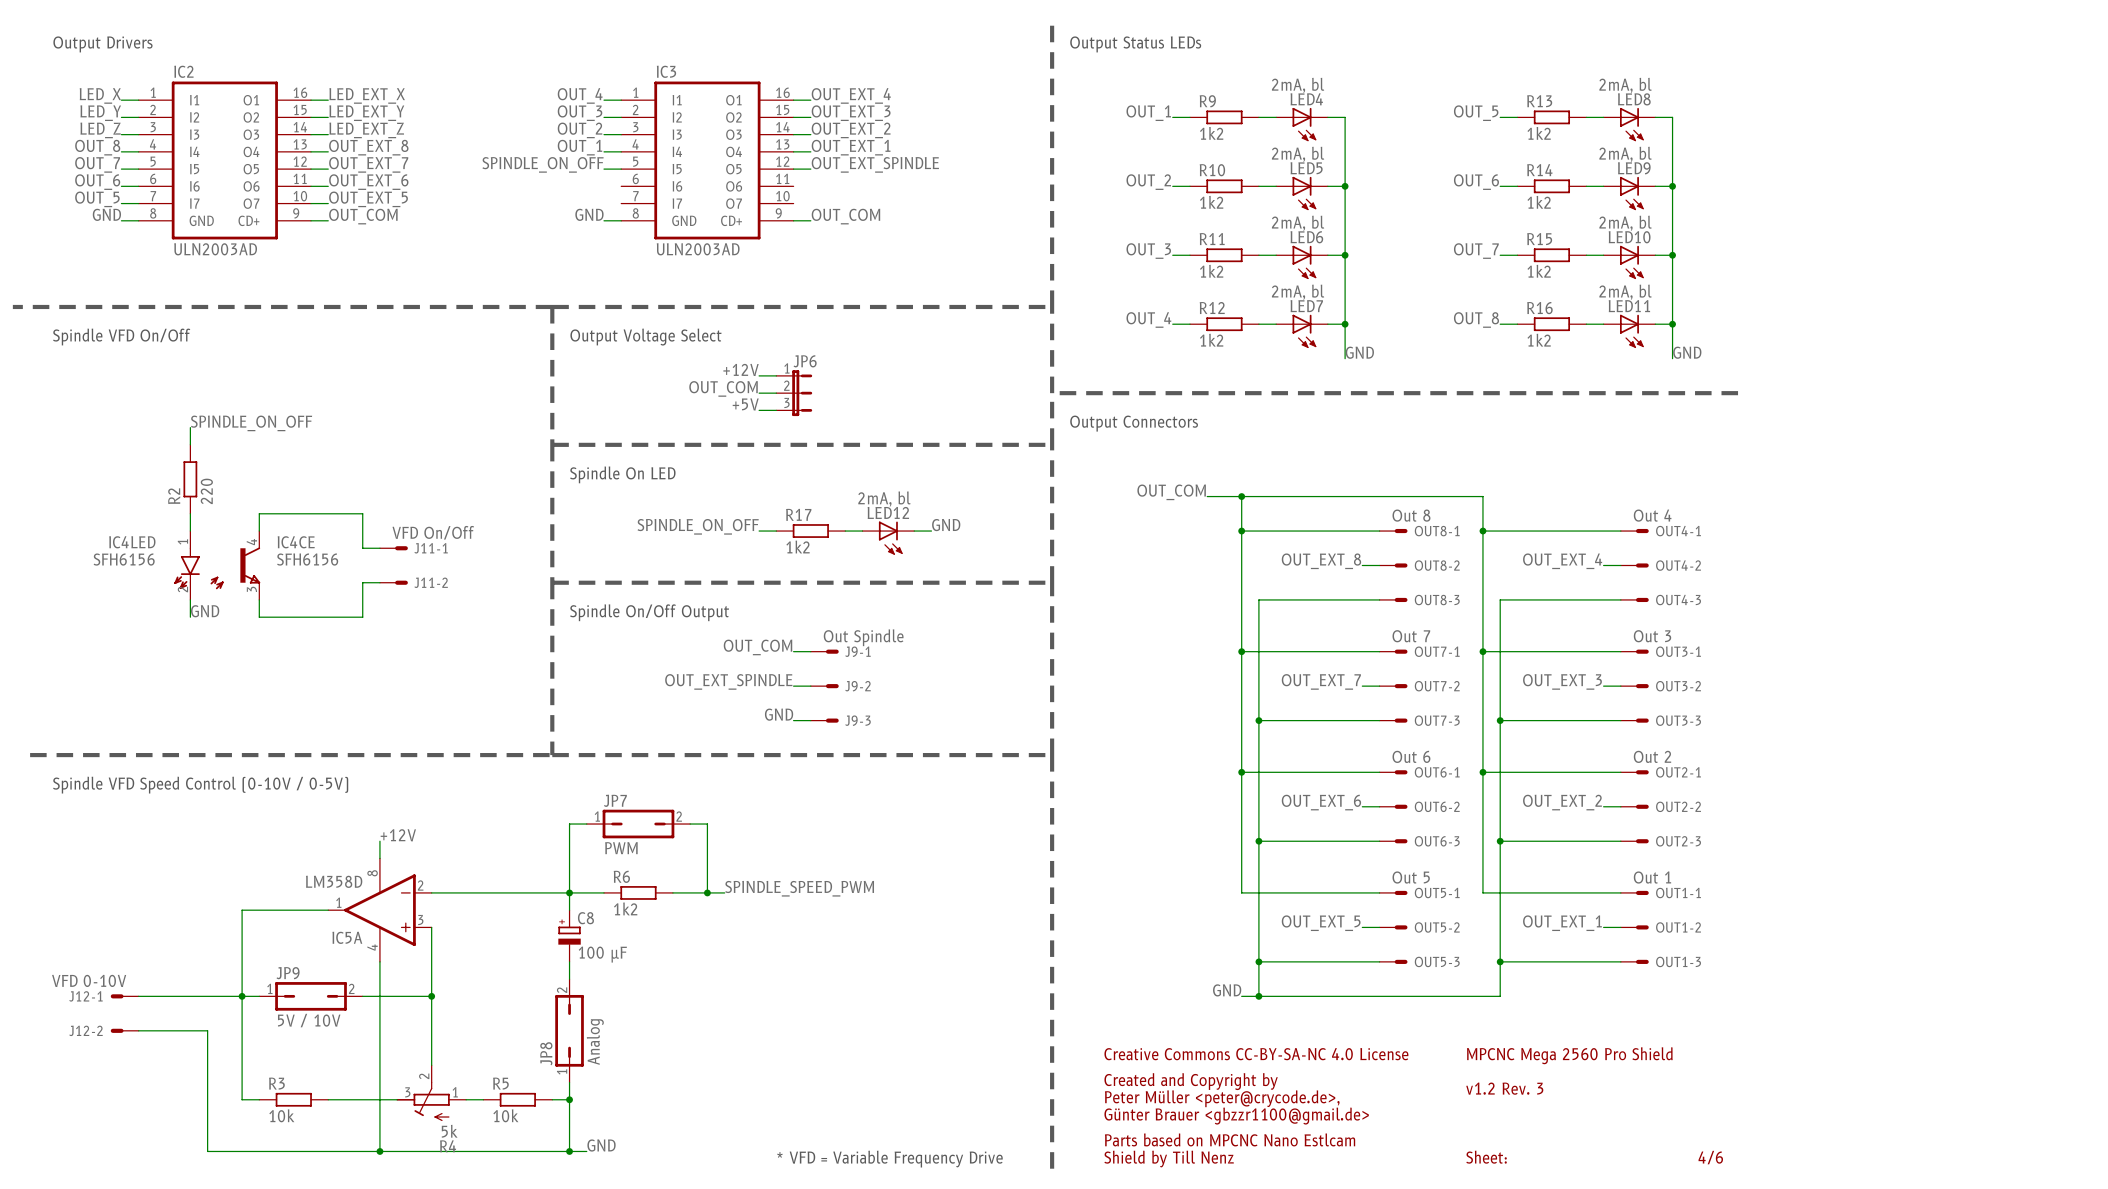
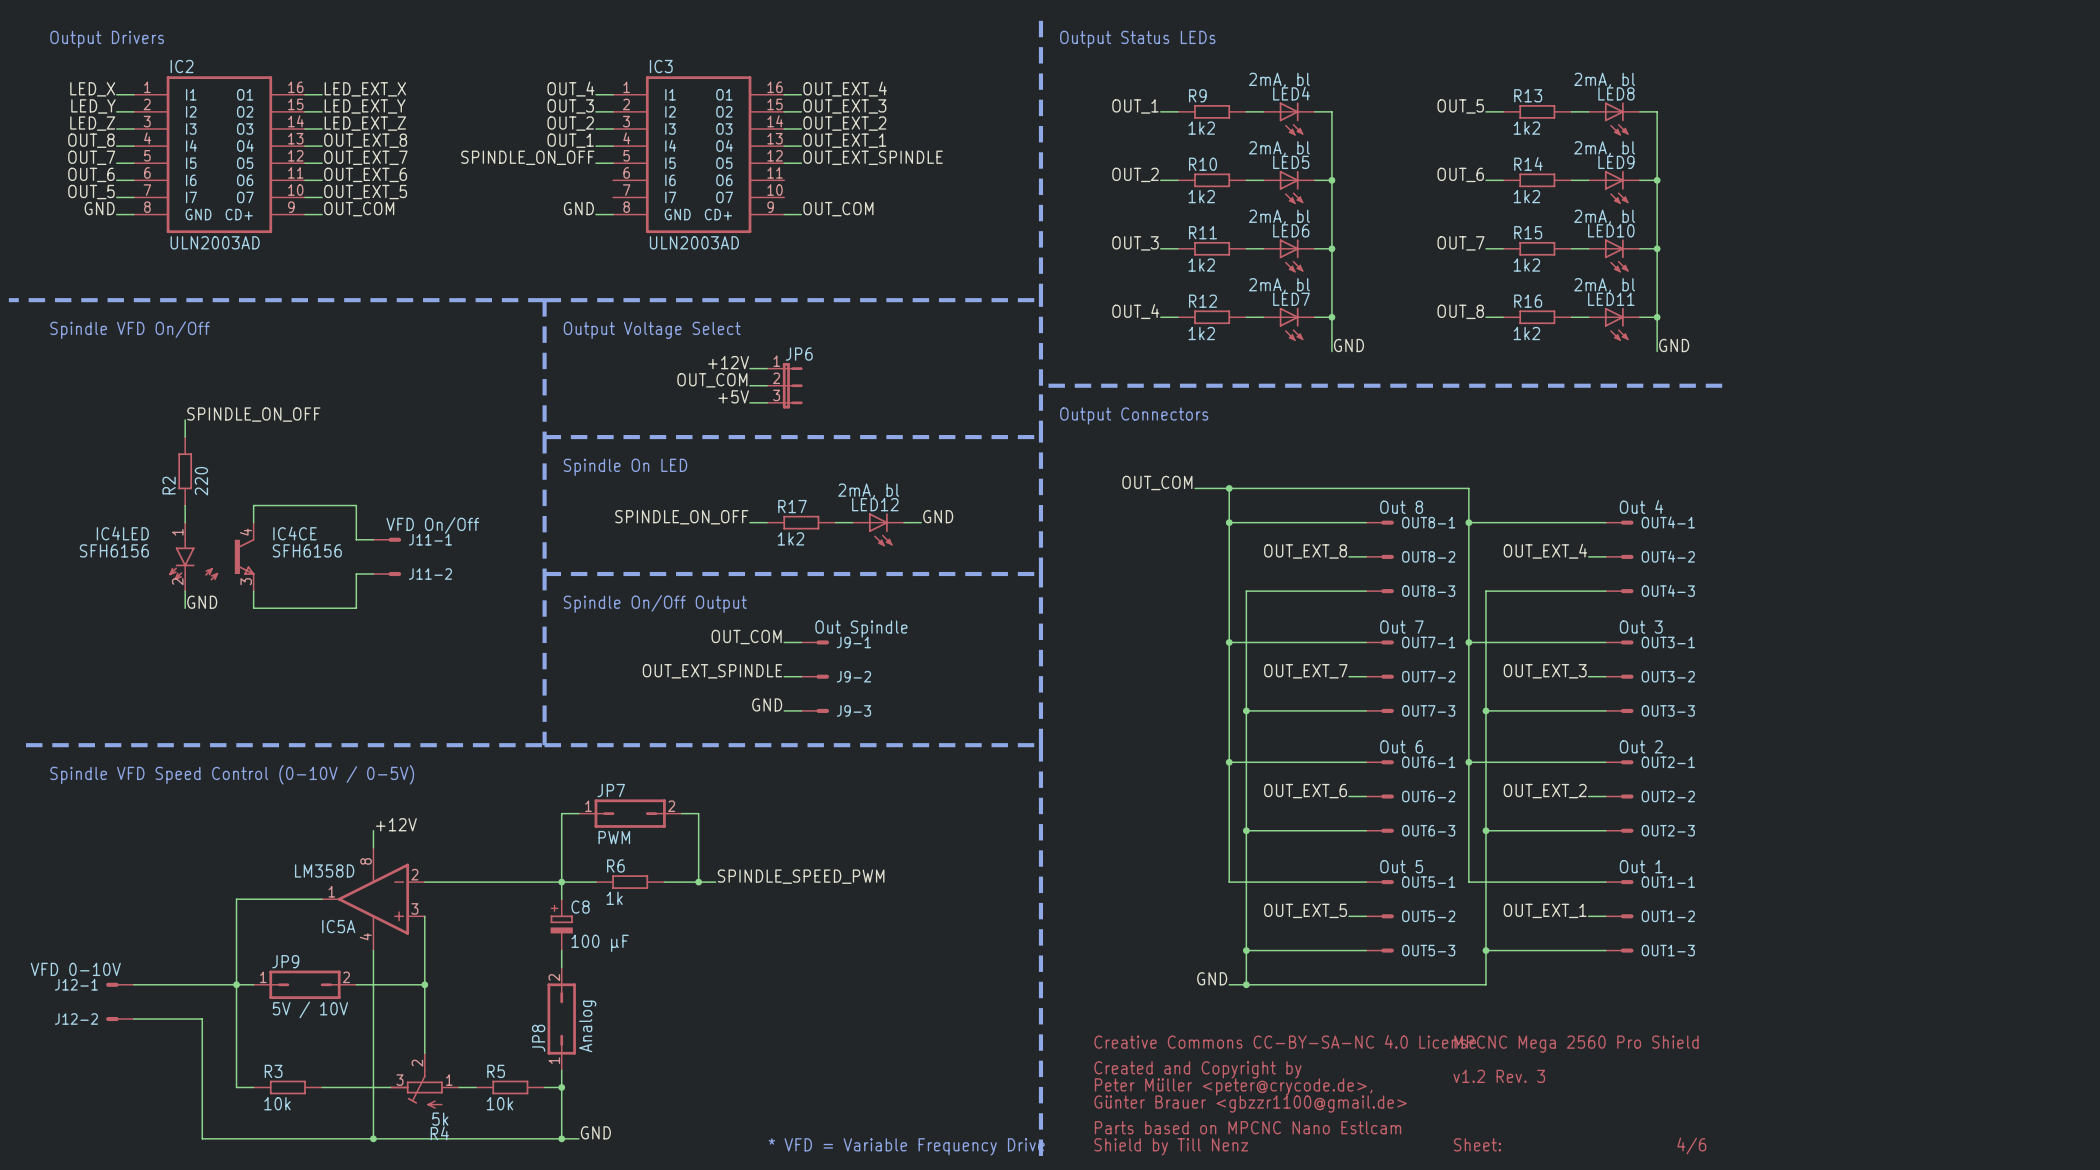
R6 value: 1k2 (625, 908) -> 1k (614, 898)

